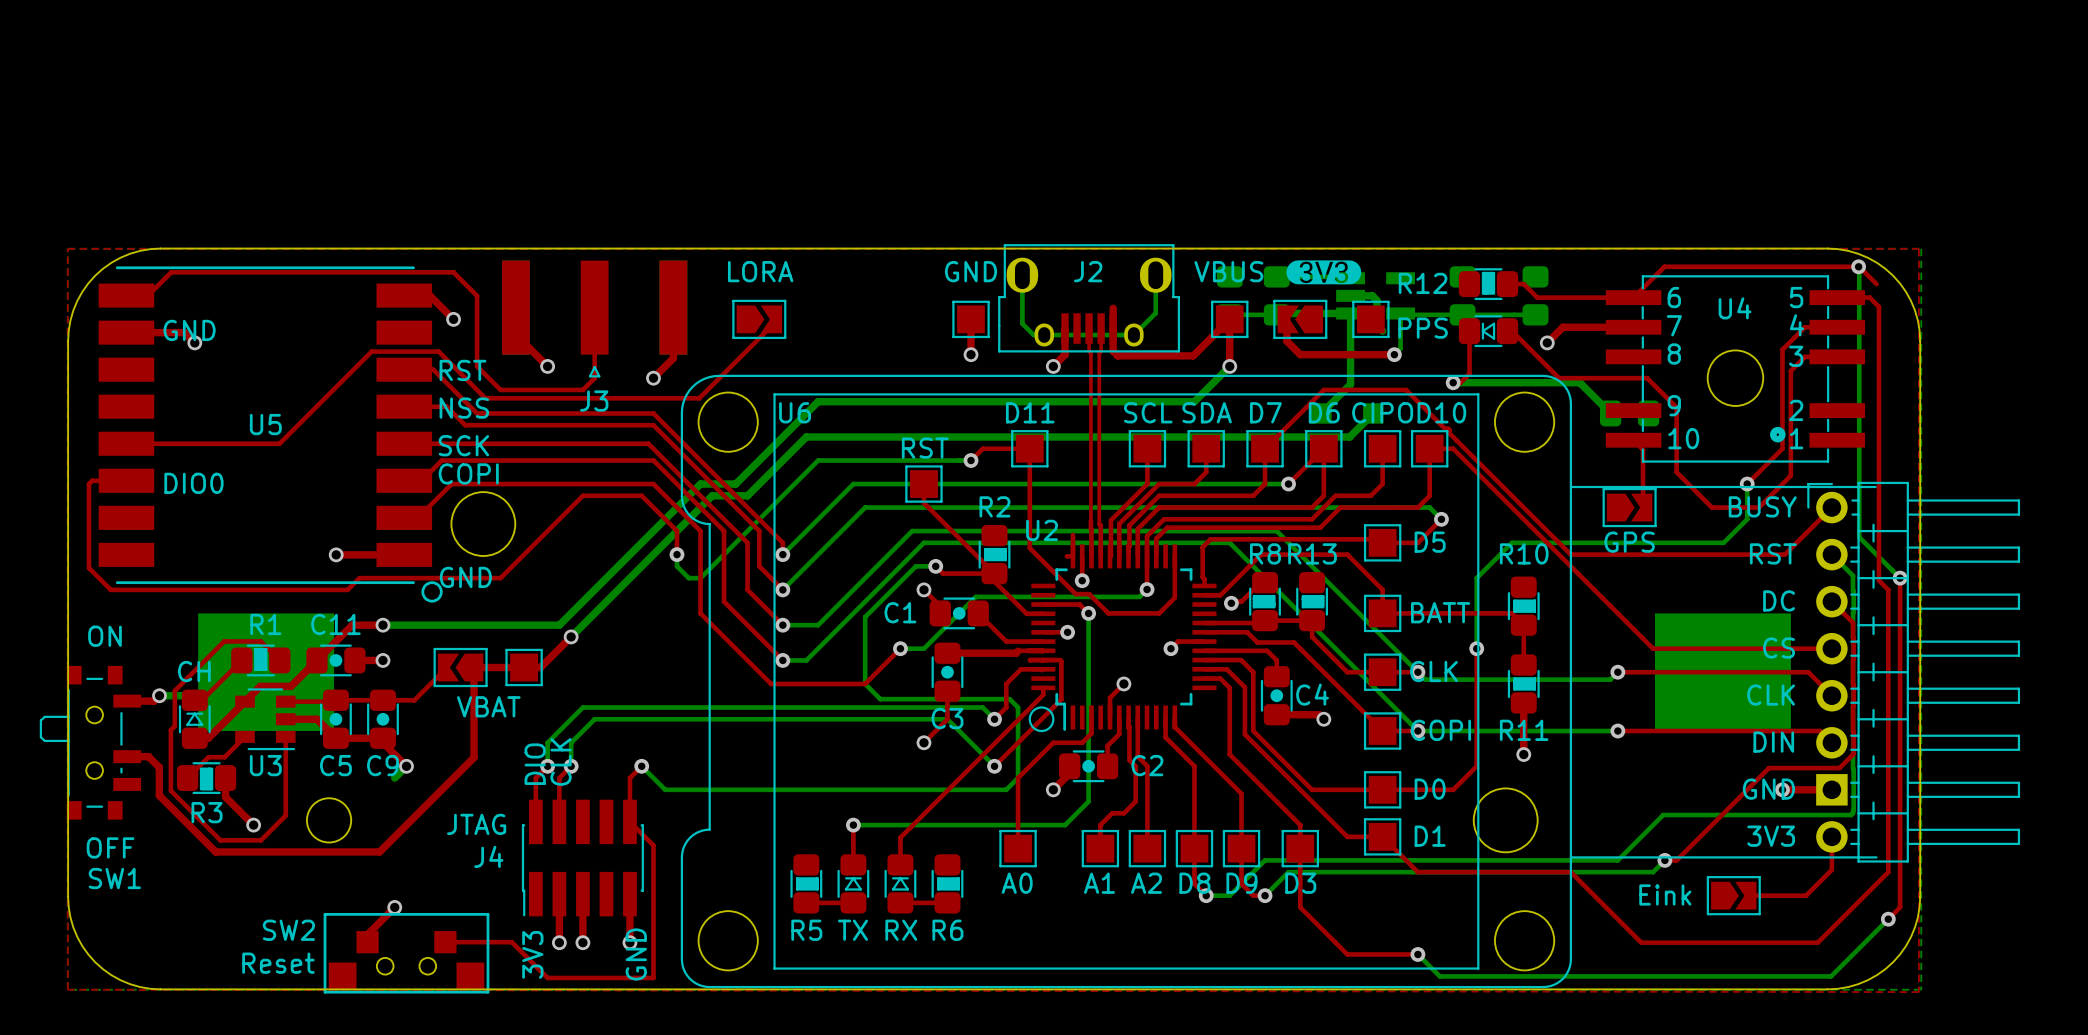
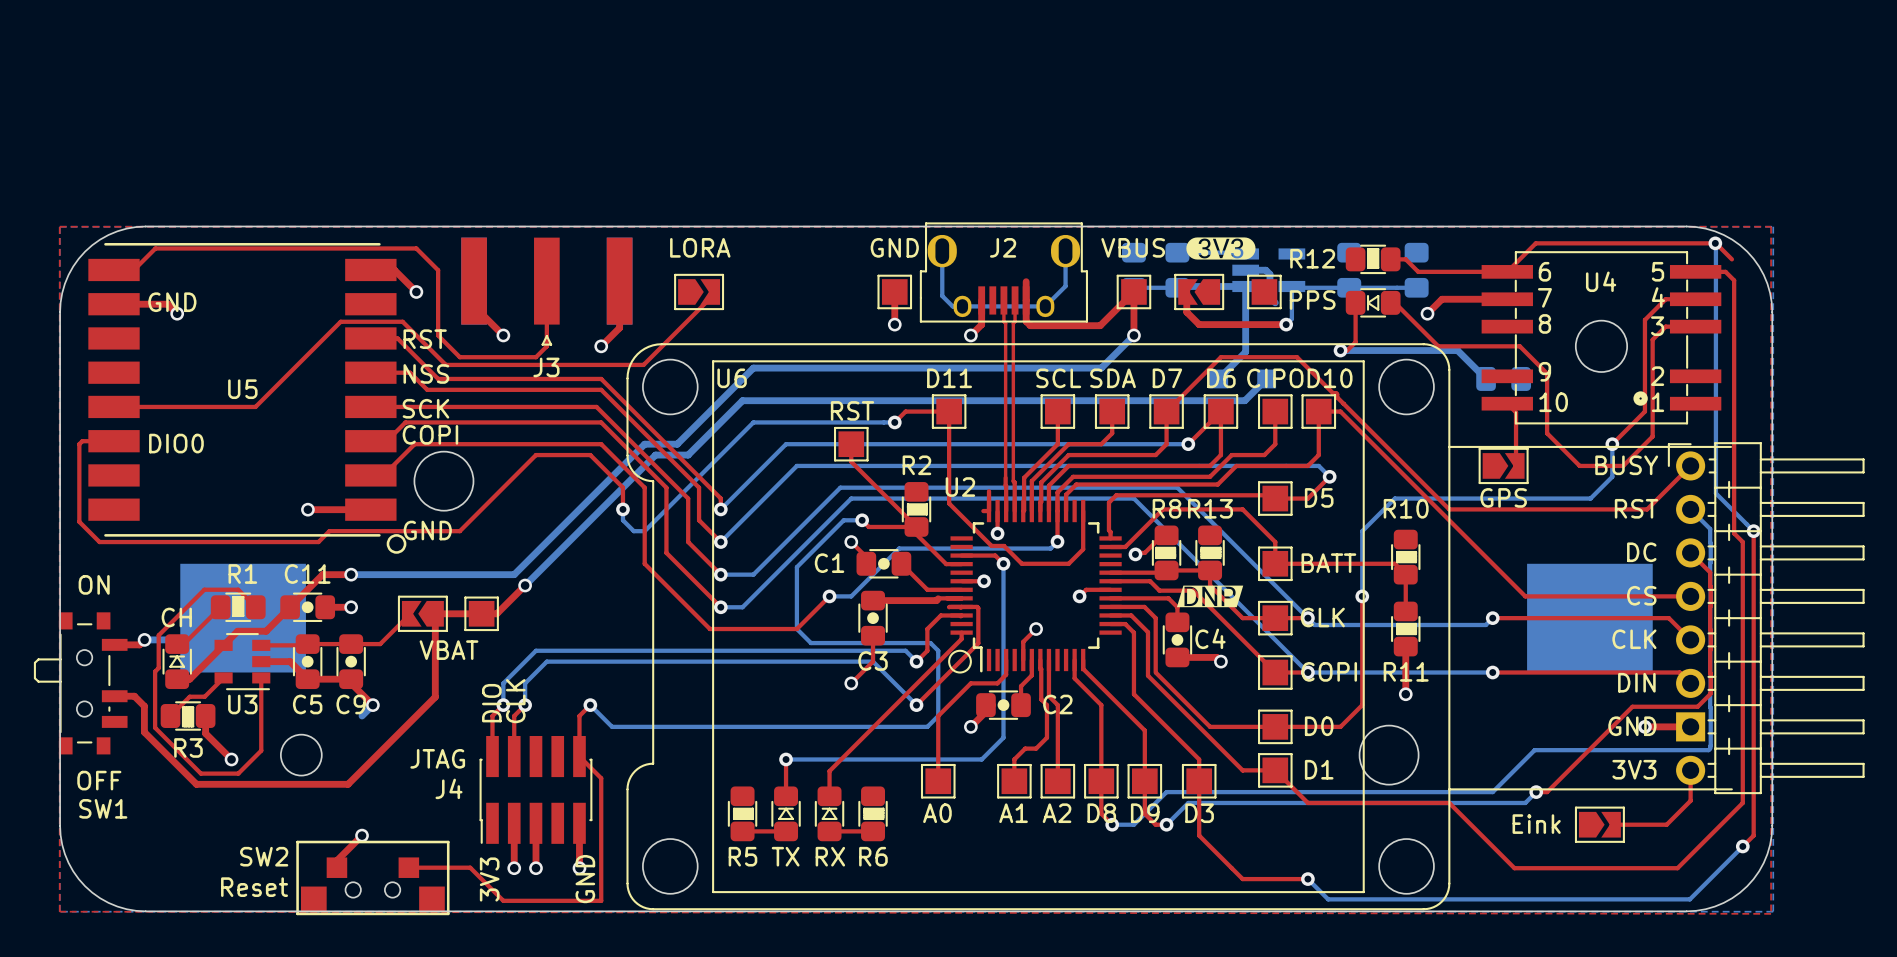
drawing: none -> [1176, 585, 1244, 608]

